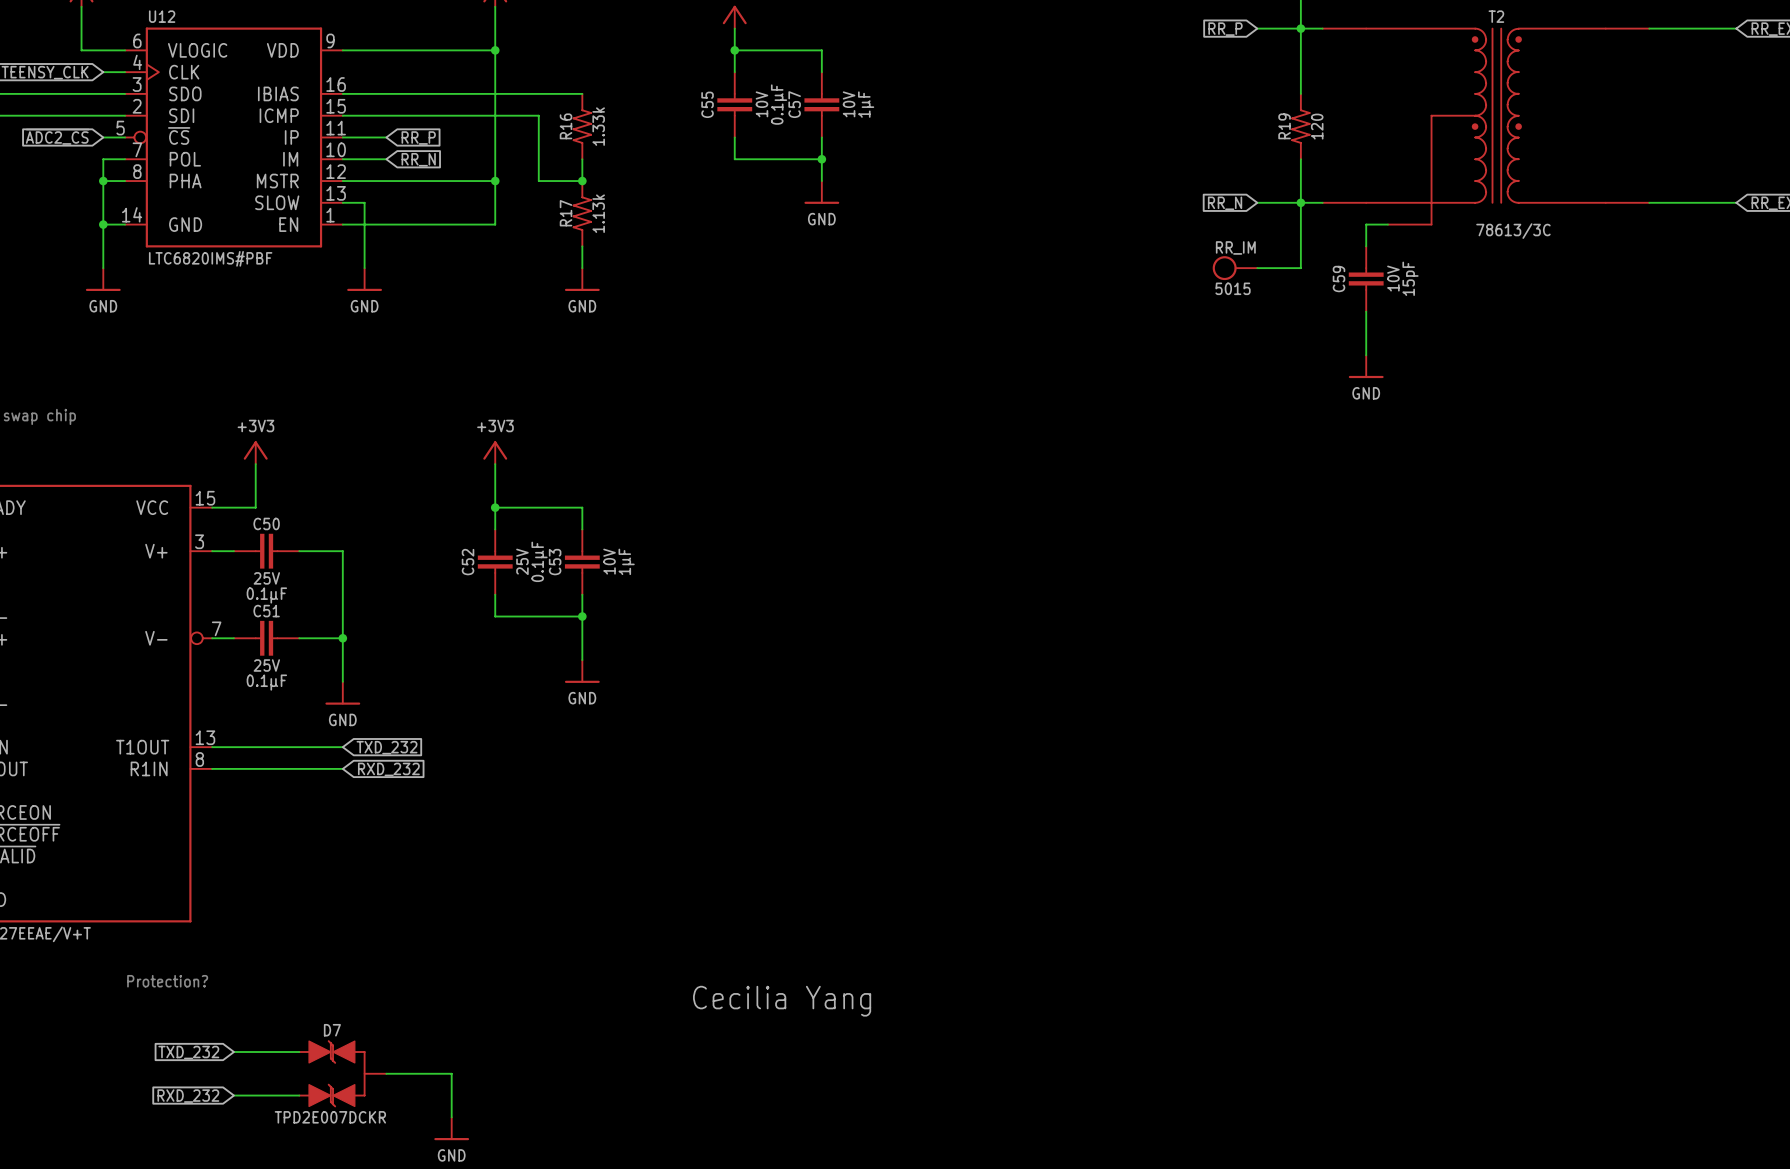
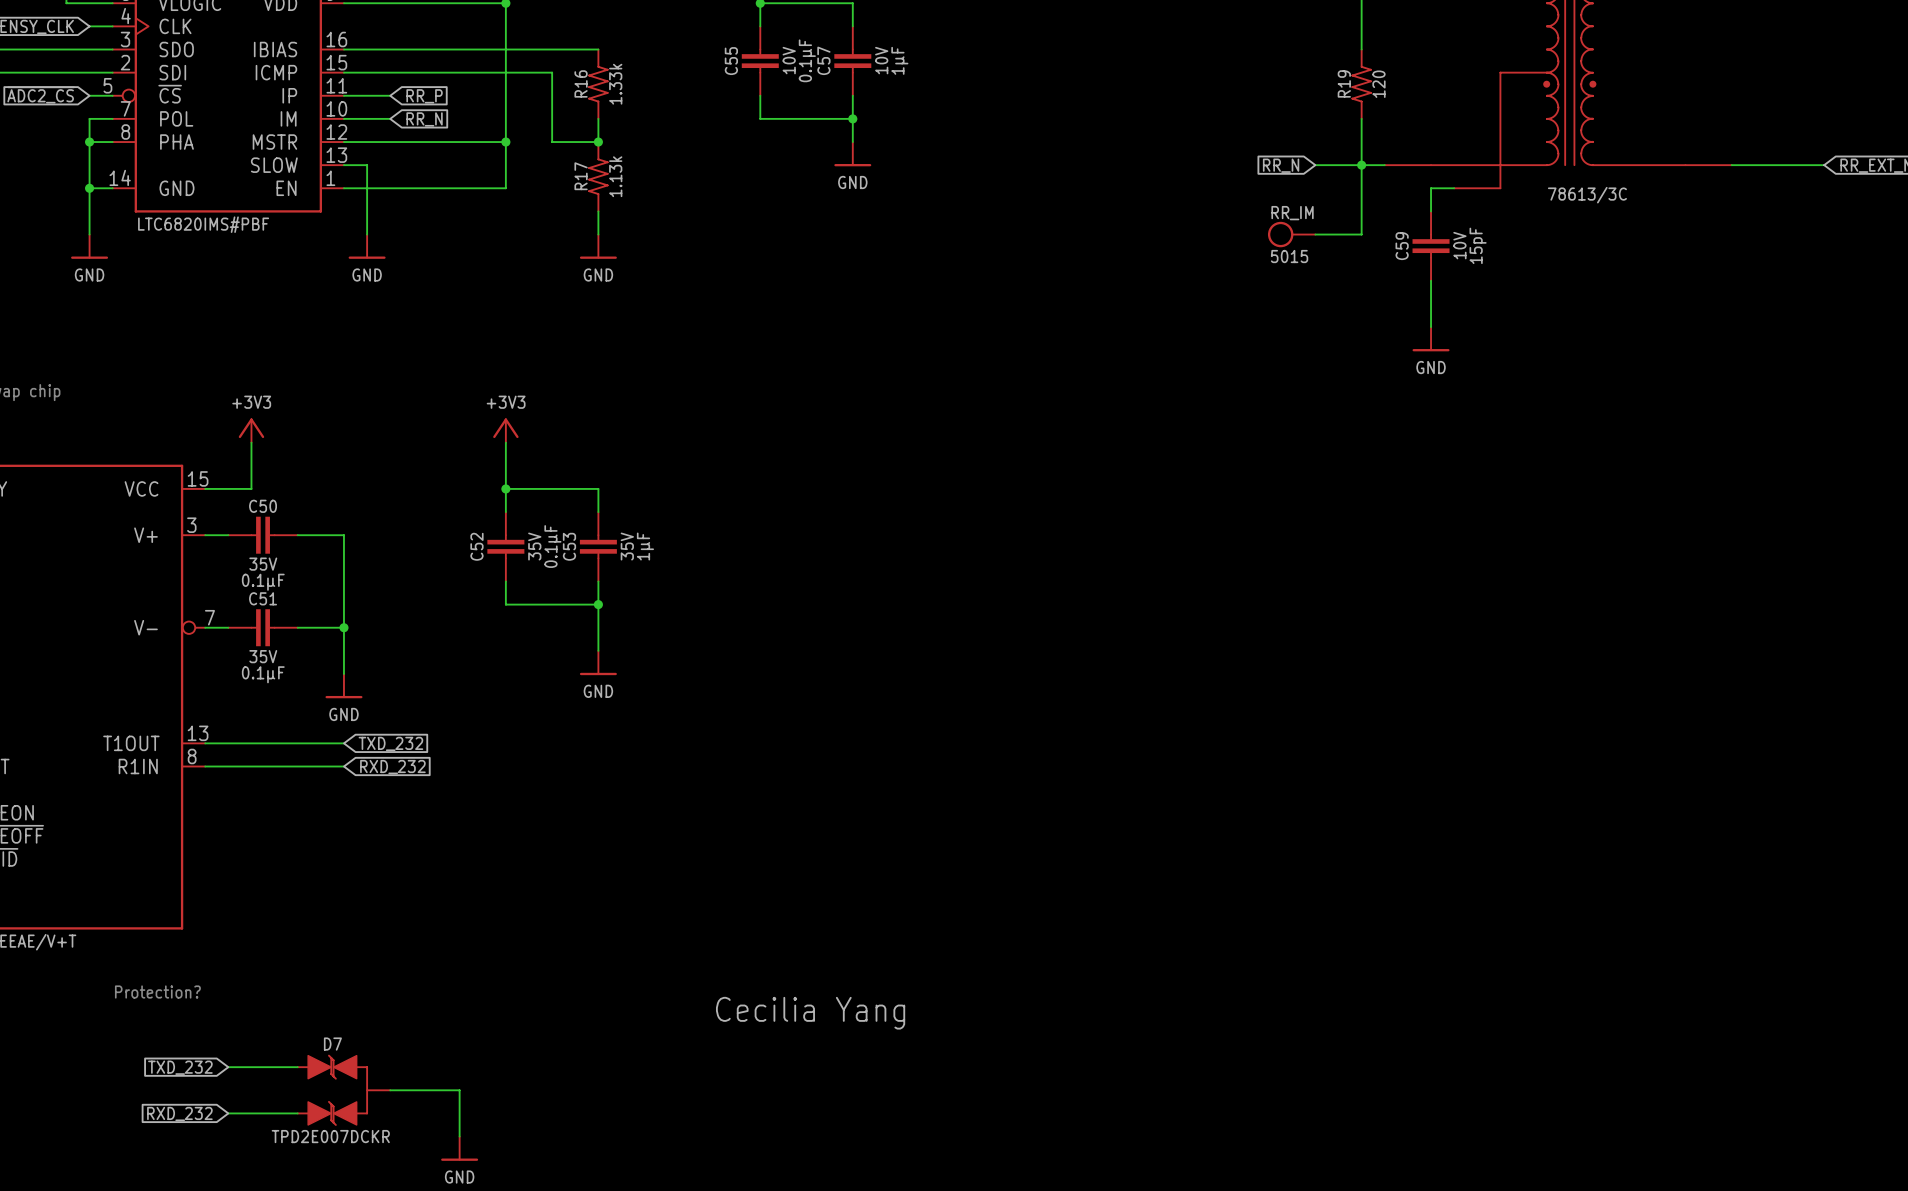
C52 text: 25V (522, 561) -> 35V (534, 546)
C53 text: 10V (609, 561) -> 35V (627, 546)
C50 text: 25V (266, 578) -> 35V (263, 564)
C51 text: 25V (266, 665) -> 35V (263, 656)

